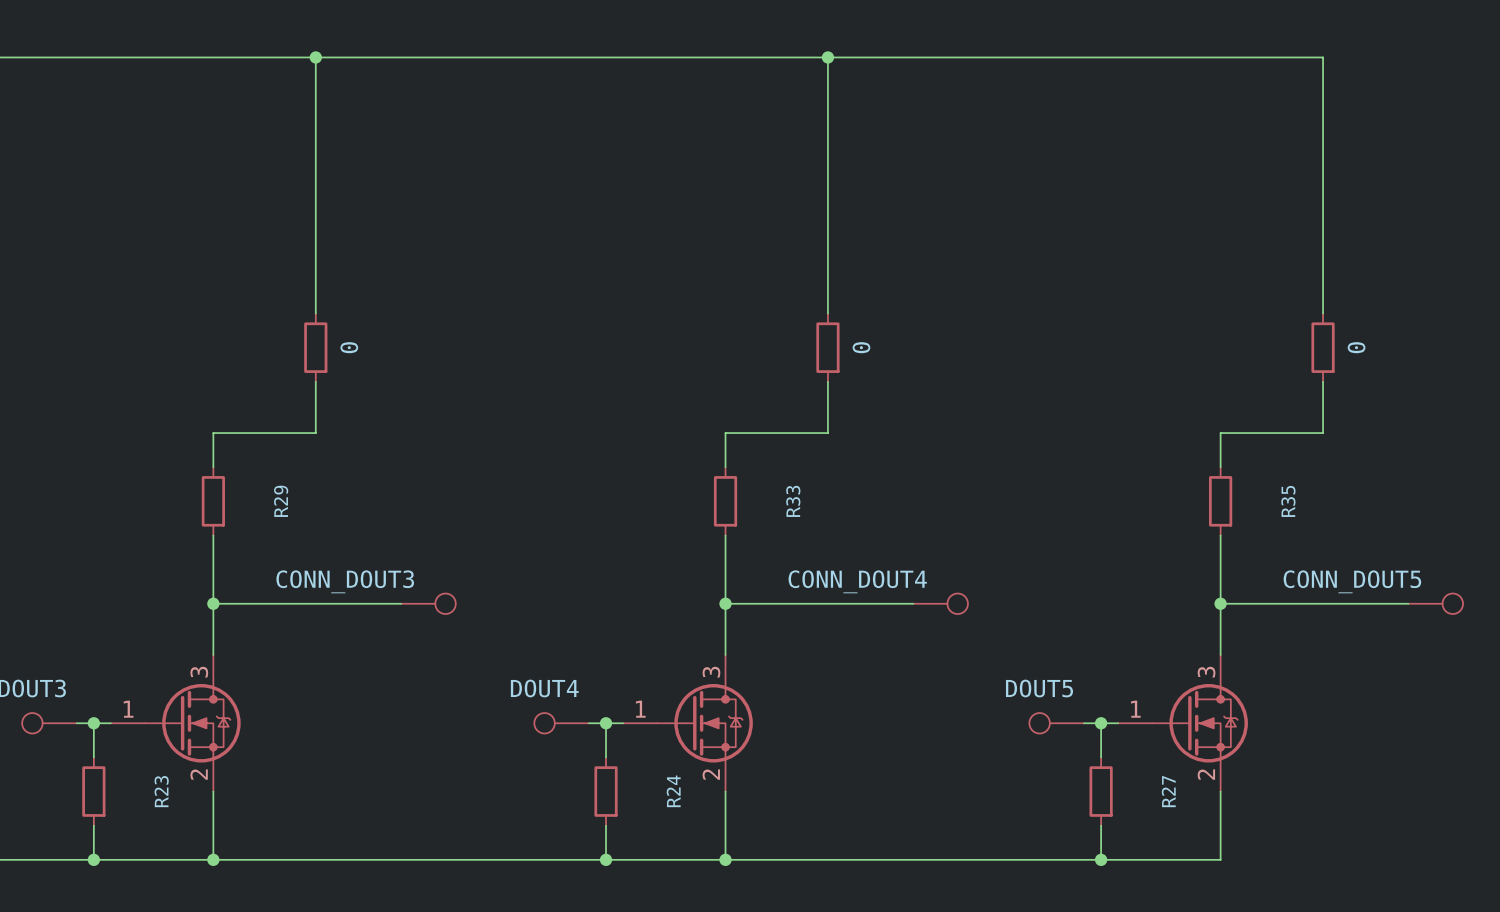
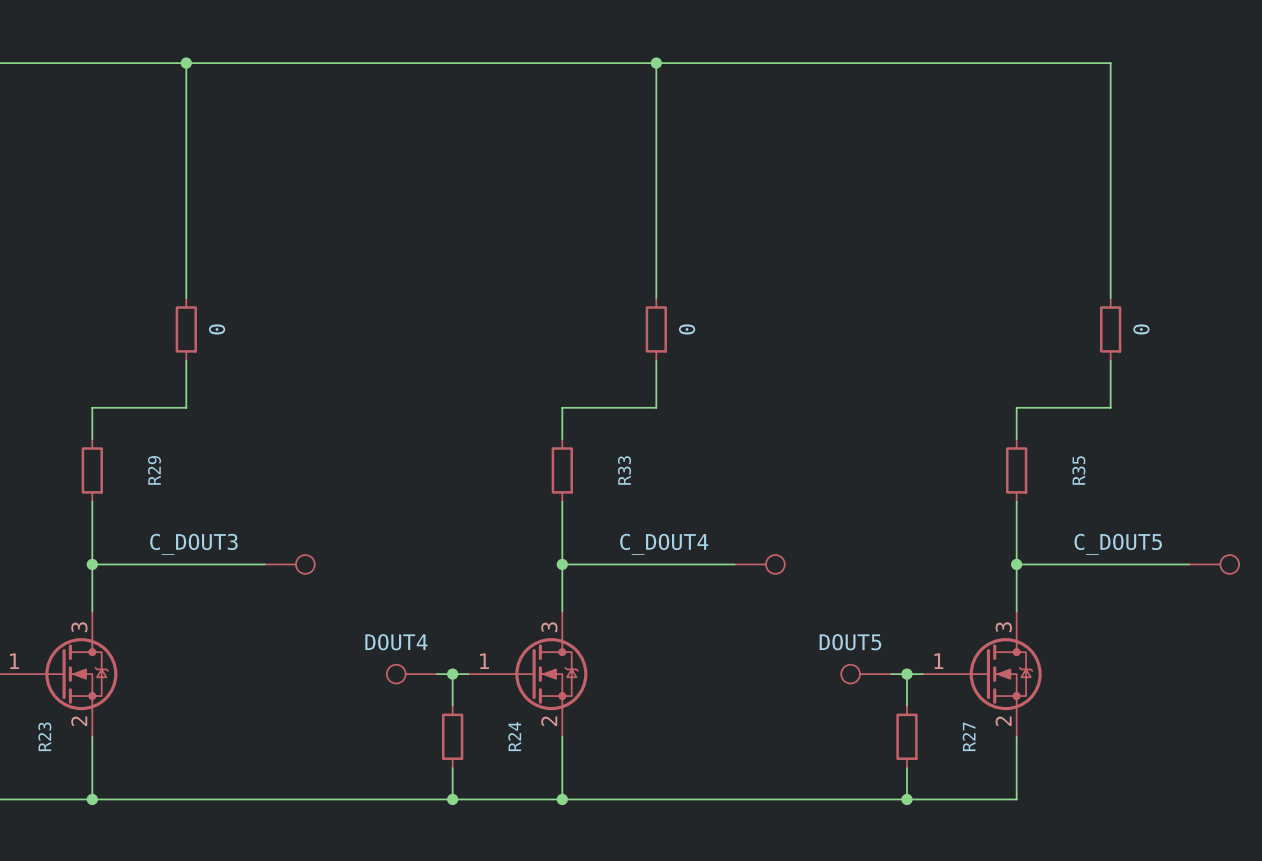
CONN_DOUT3 name: CONN_DOUT3 (345, 581) -> C_DOUT3 (193, 544)
CONN_DOUT4 name: CONN_DOUT4 (857, 581) -> C_DOUT4 (664, 544)
CONN_DOUT5 name: CONN_DOUT5 (1352, 581) -> C_DOUT5 (1118, 544)

